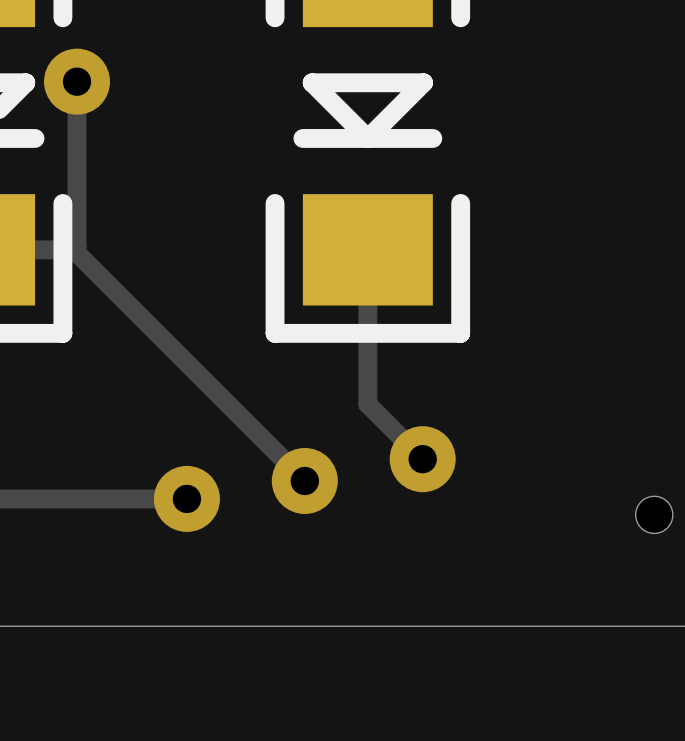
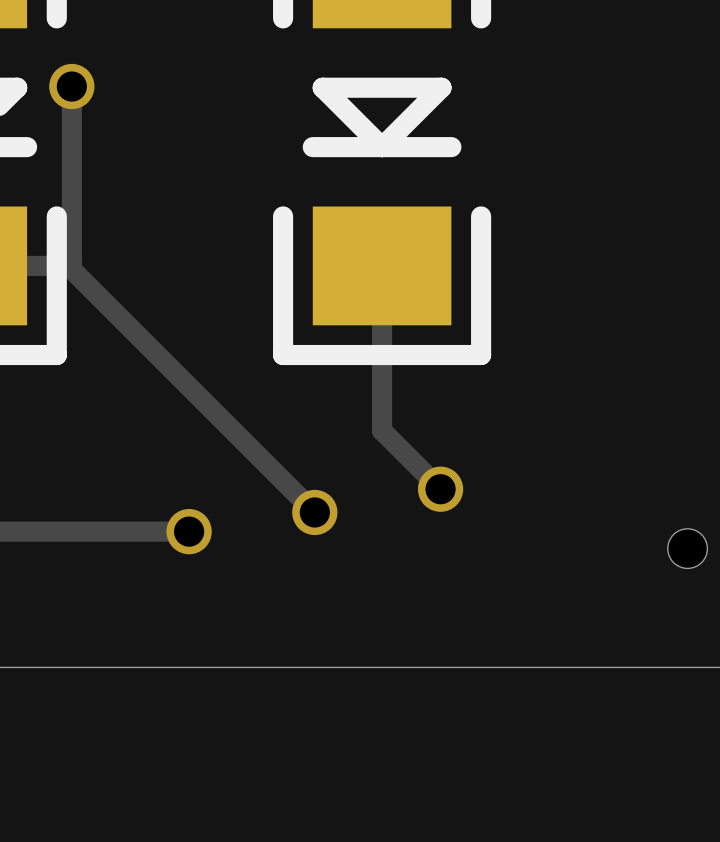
via size: [44, 48, 111, 115] -> [49, 63, 95, 110]
via size: [389, 426, 456, 493] -> [417, 466, 464, 512]
via size: [271, 447, 338, 514] -> [292, 489, 338, 536]
via size: [153, 465, 220, 532] -> [166, 508, 212, 555]

